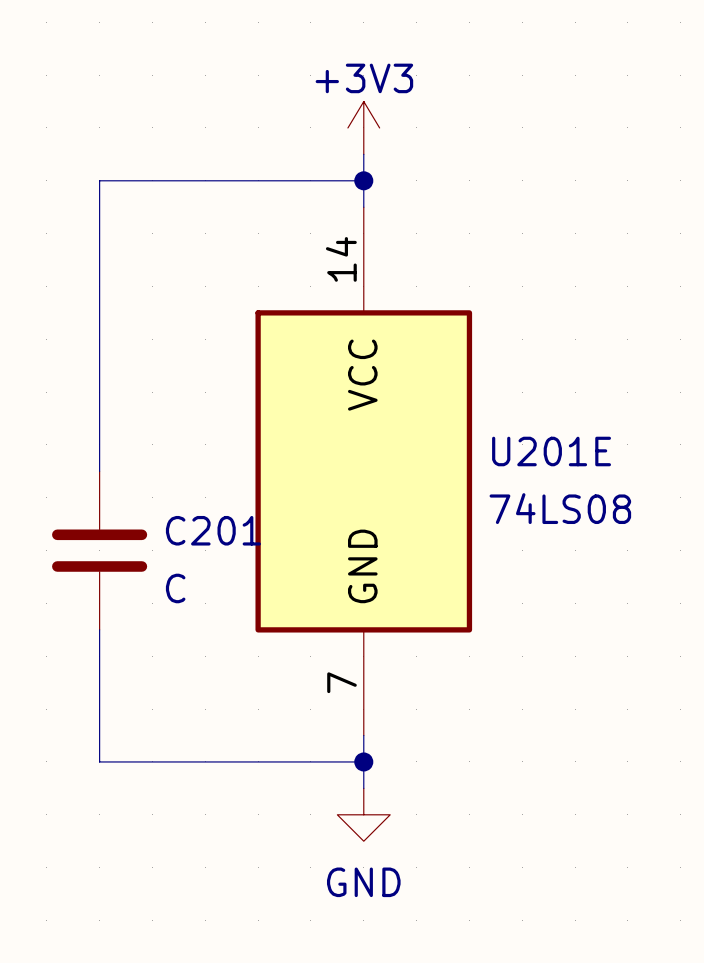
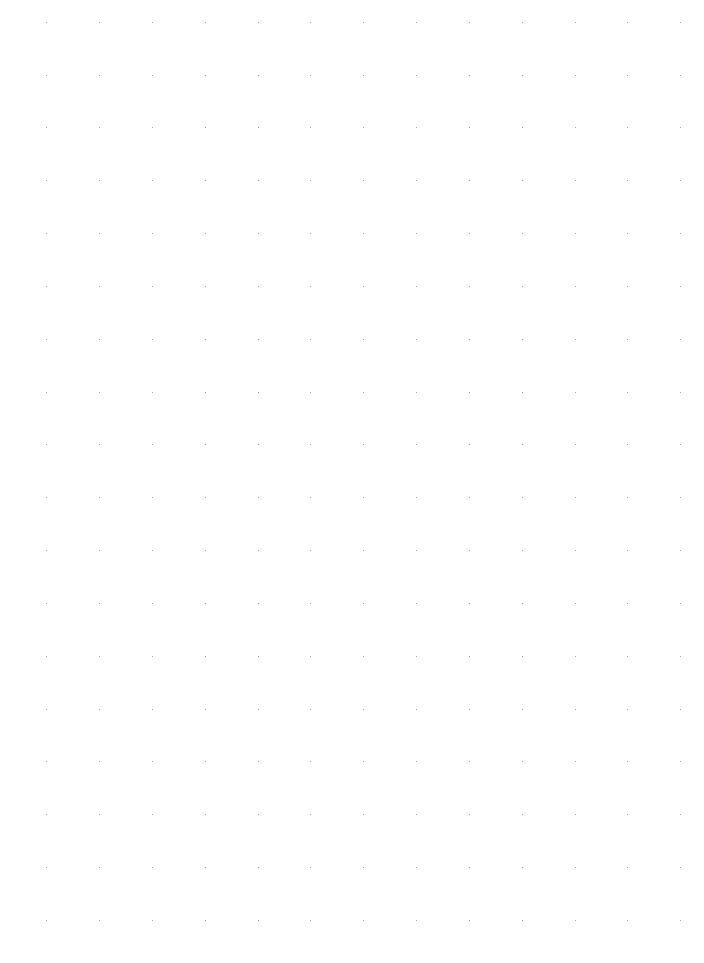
power symbol: +3V3 (363, 127) -> none
wire: (363, 154) (363, 207) -> none
wire: (363, 180) (99, 180) (99, 471) -> none
junction: (363, 180) -> none
U201E: 74LS08 (363, 471) -> none
C201: C (99, 550) -> none
wire: (99, 629) (99, 761) (363, 761) -> none
wire: (363, 735) (363, 788) -> none
junction: (363, 761) -> none
power symbol: GND (363, 814) -> none

